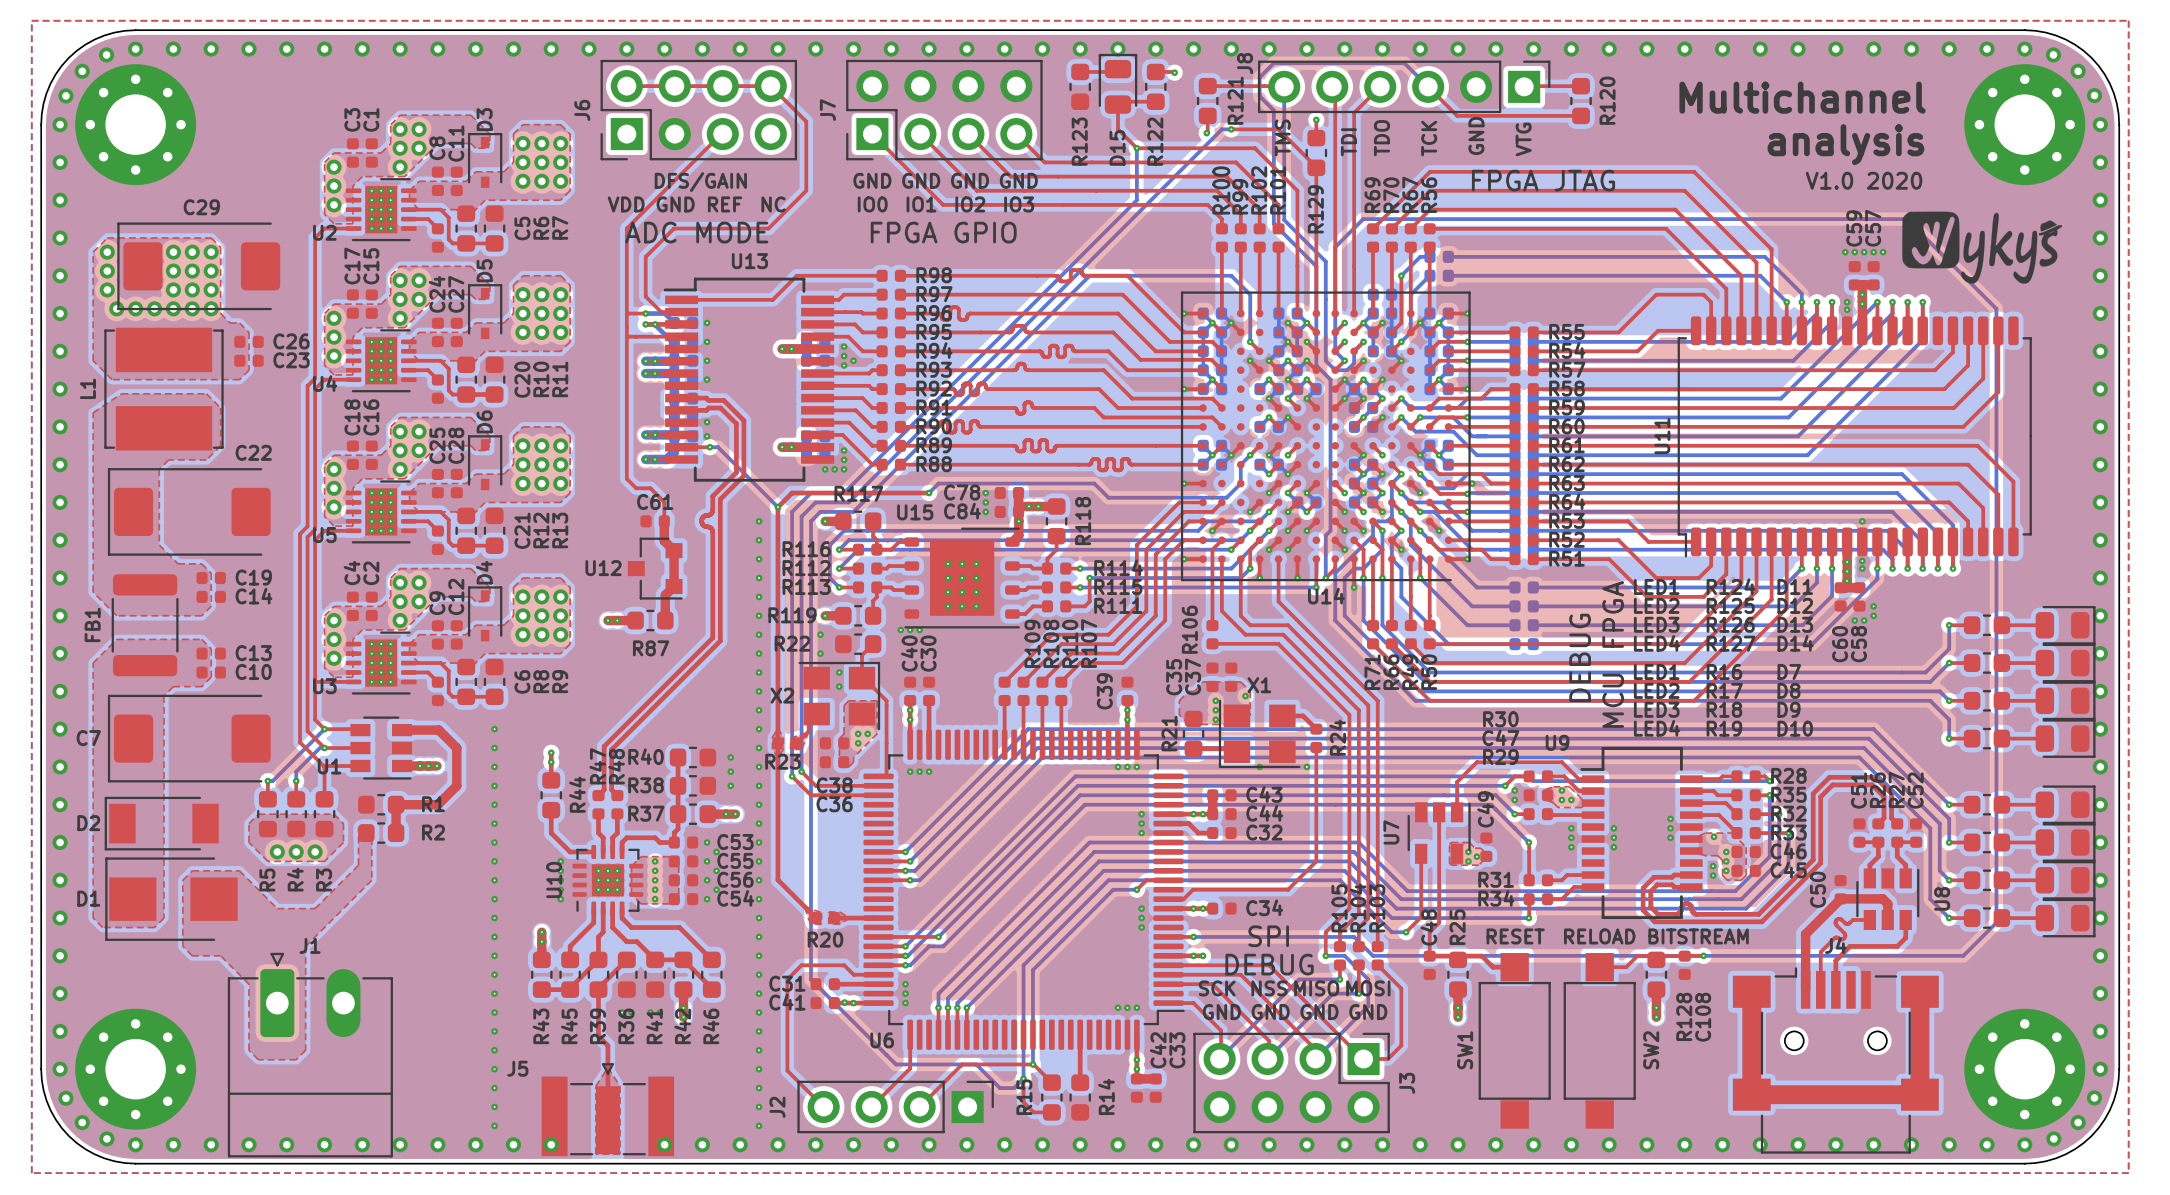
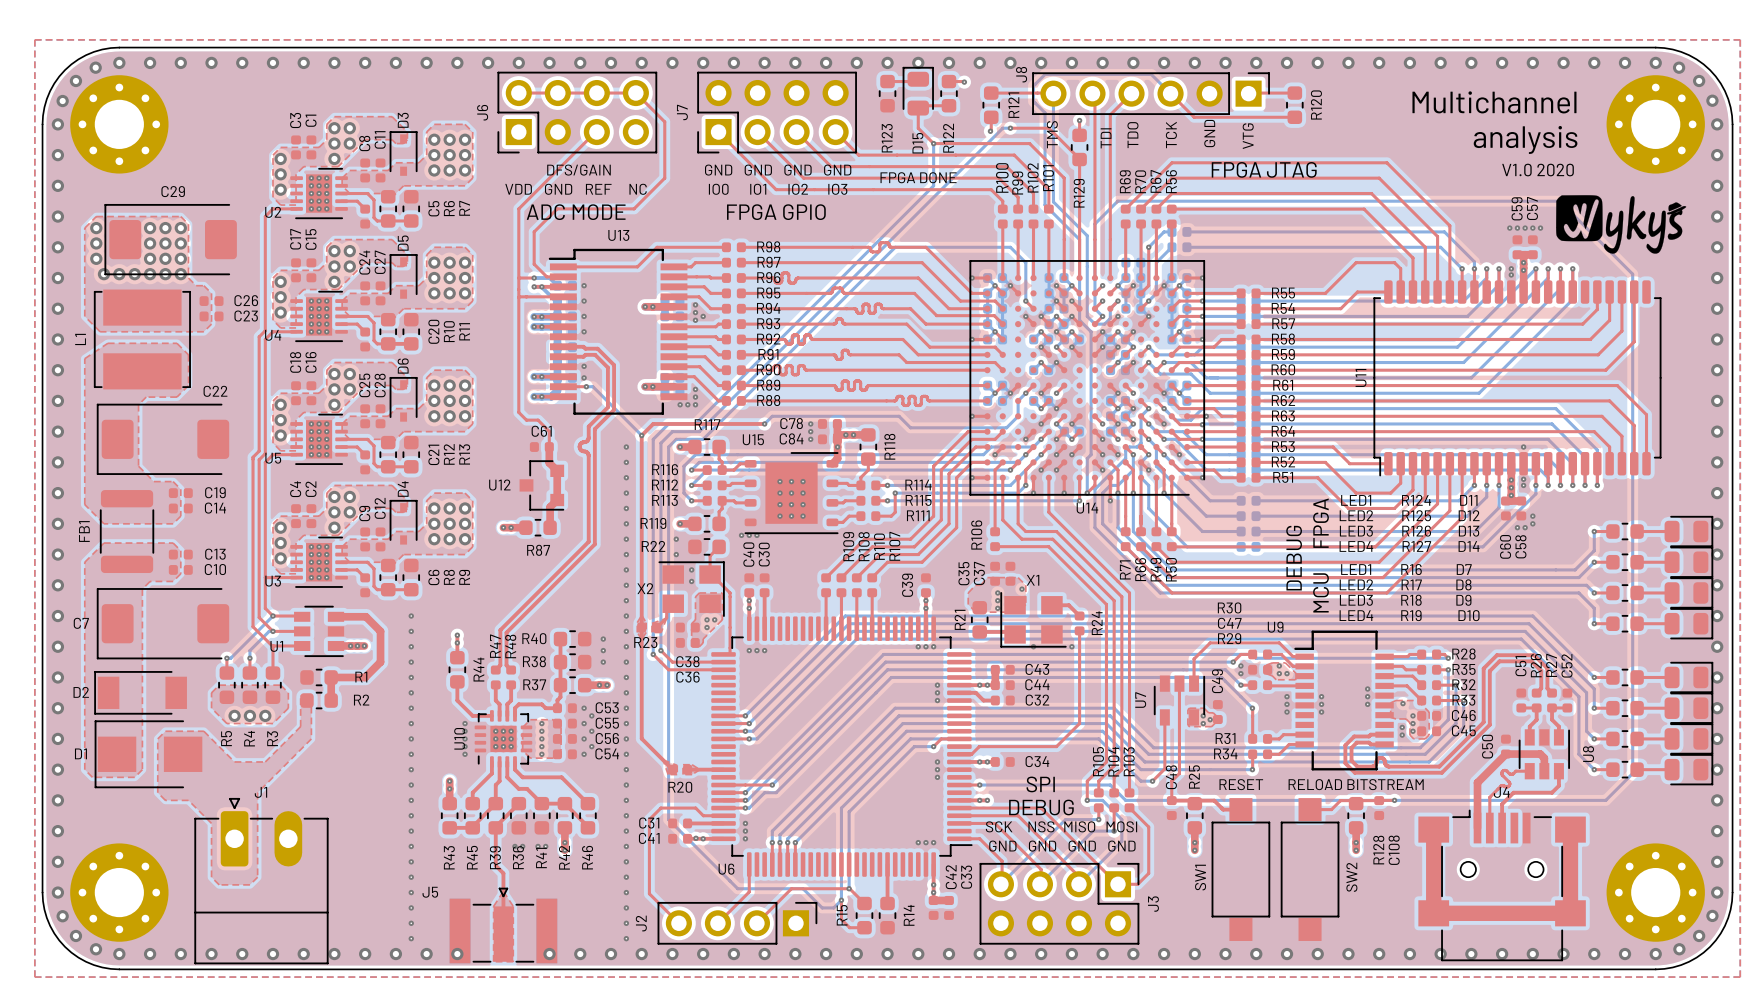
text: none -> FPGA DONE (918, 177)

